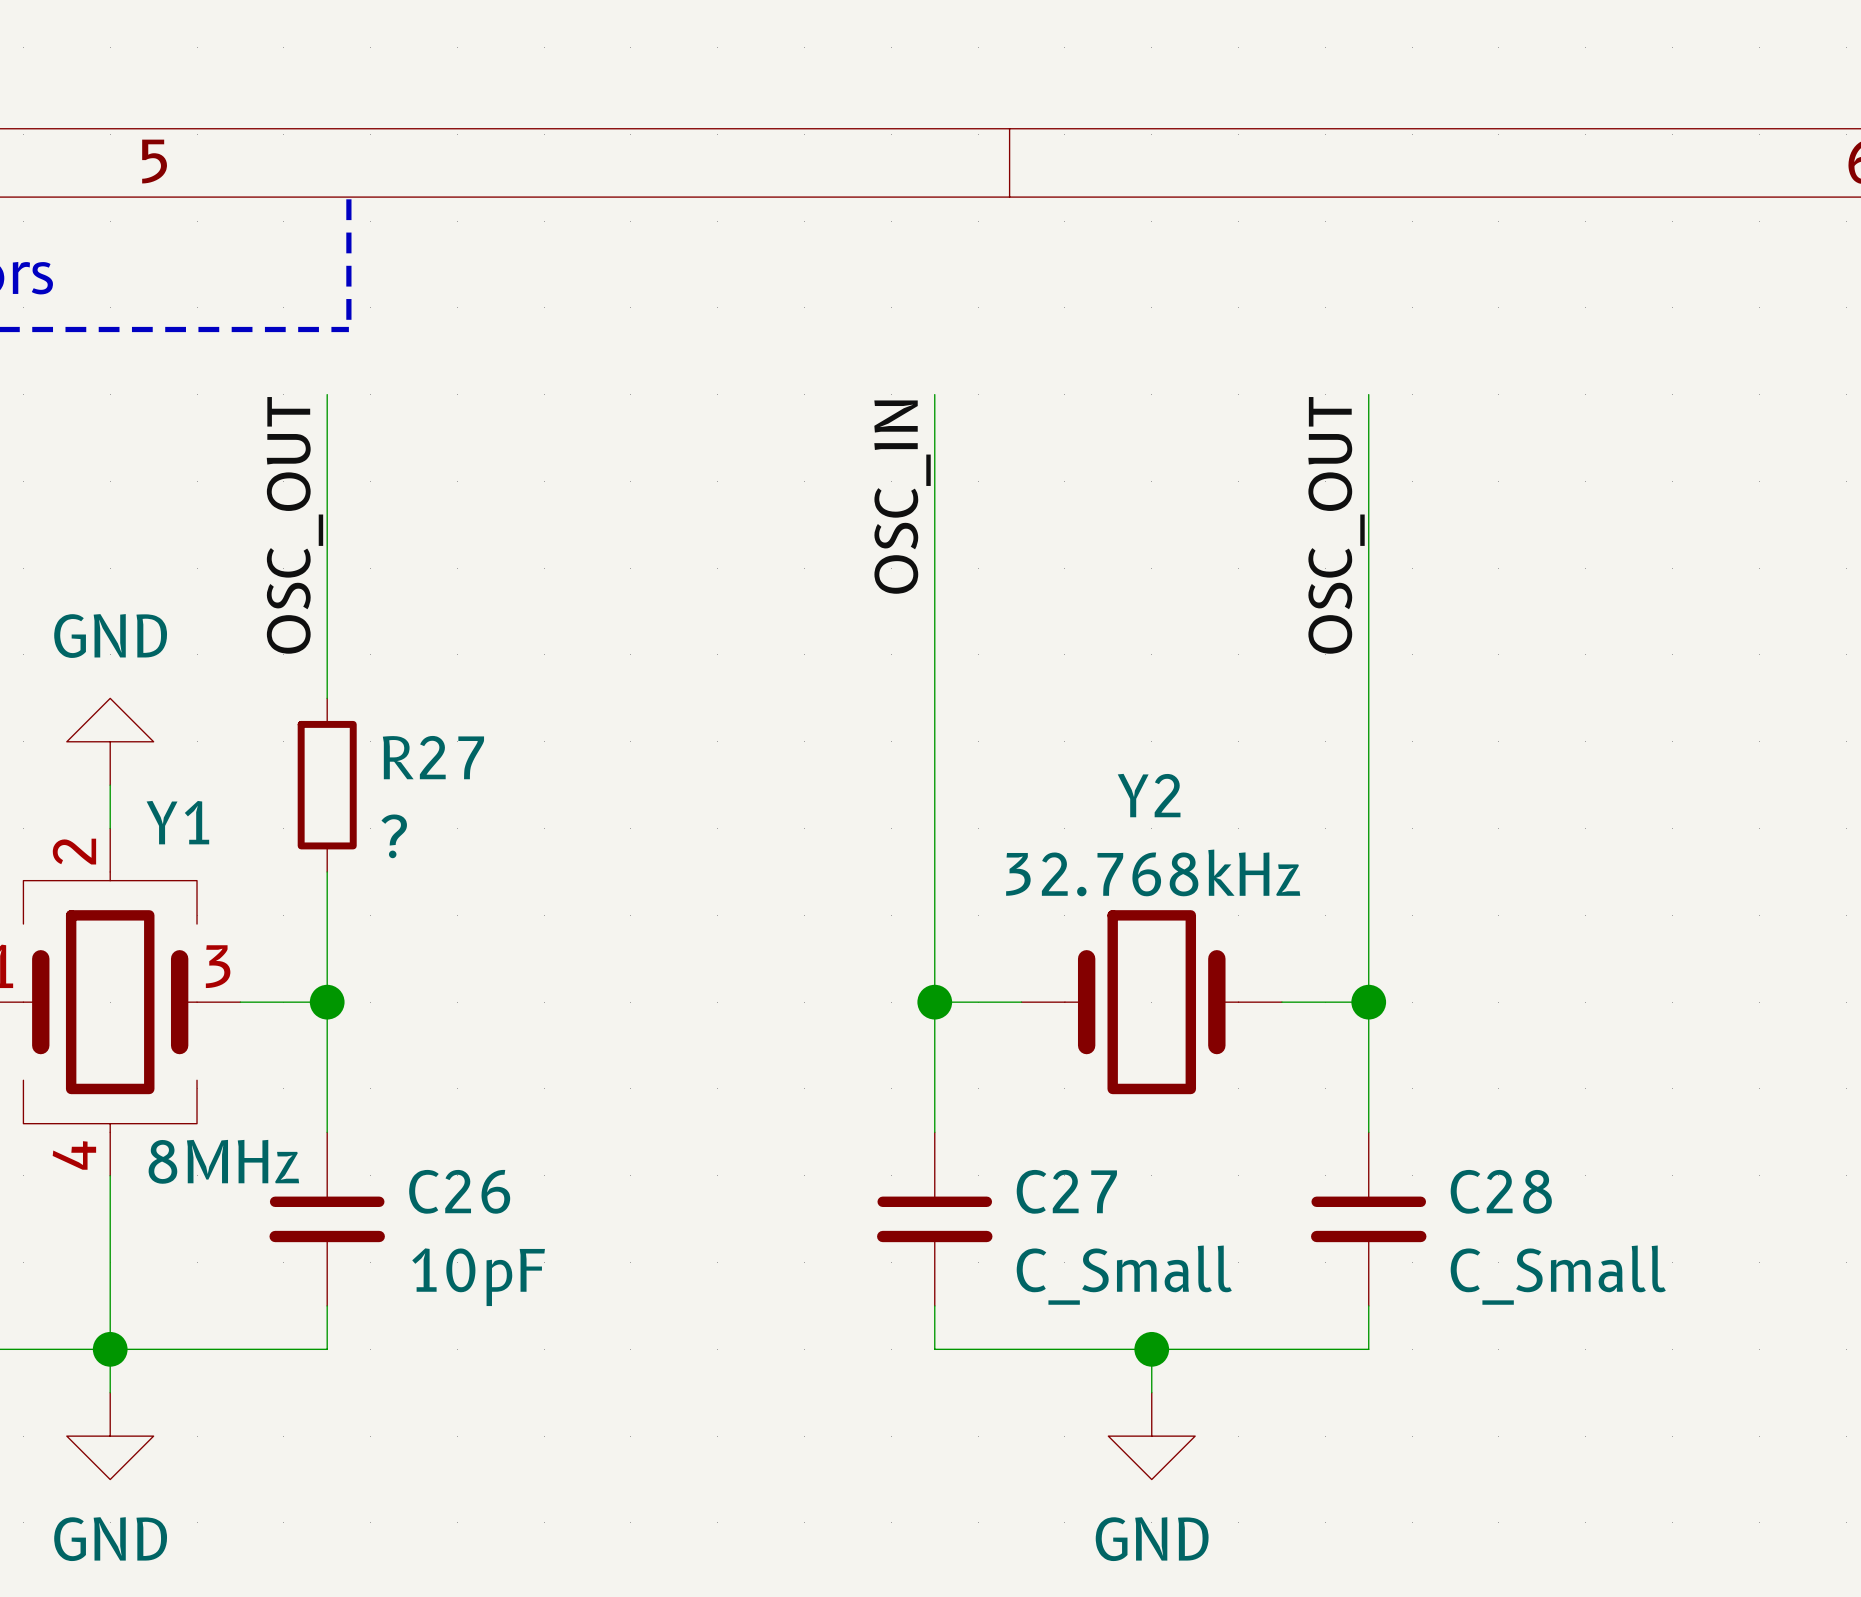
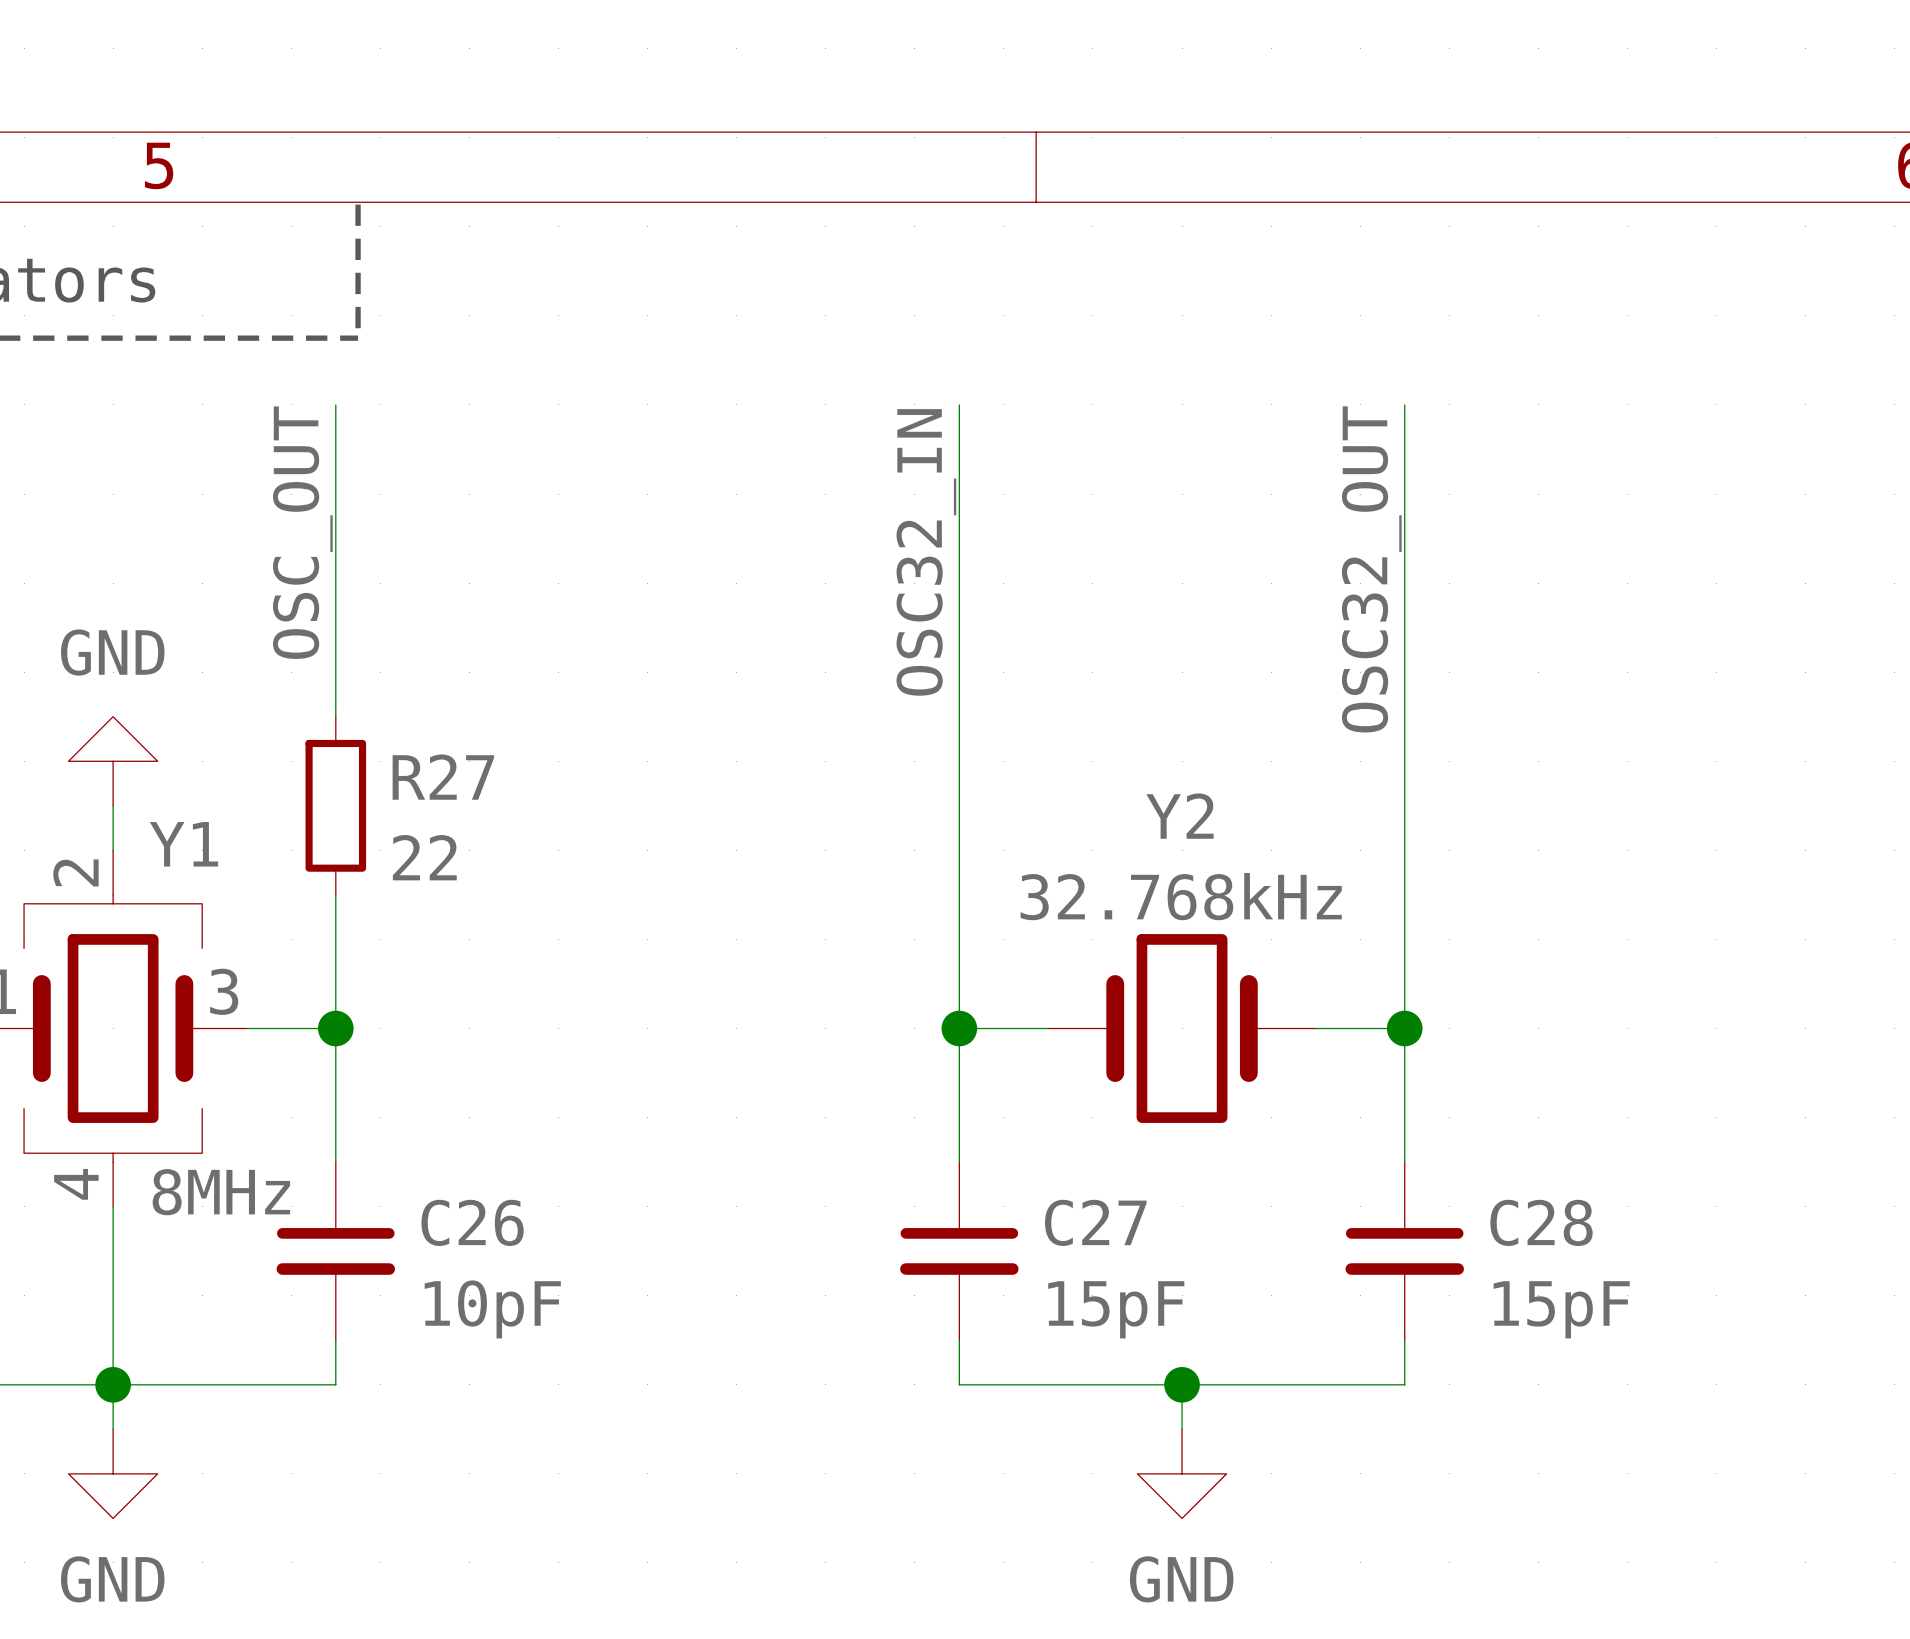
label: OSC_IN (902, 497) -> OSC32_IN (926, 552)
label: OSC_OUT (1336, 525) -> OSC32_OUT (1371, 569)
R27 value: ? (394, 836) -> 22 (424, 857)
C27 value: C_Small (1124, 1275) -> 15pF (1116, 1309)
C28 value: C_Small (1558, 1275) -> 15pF (1561, 1309)

